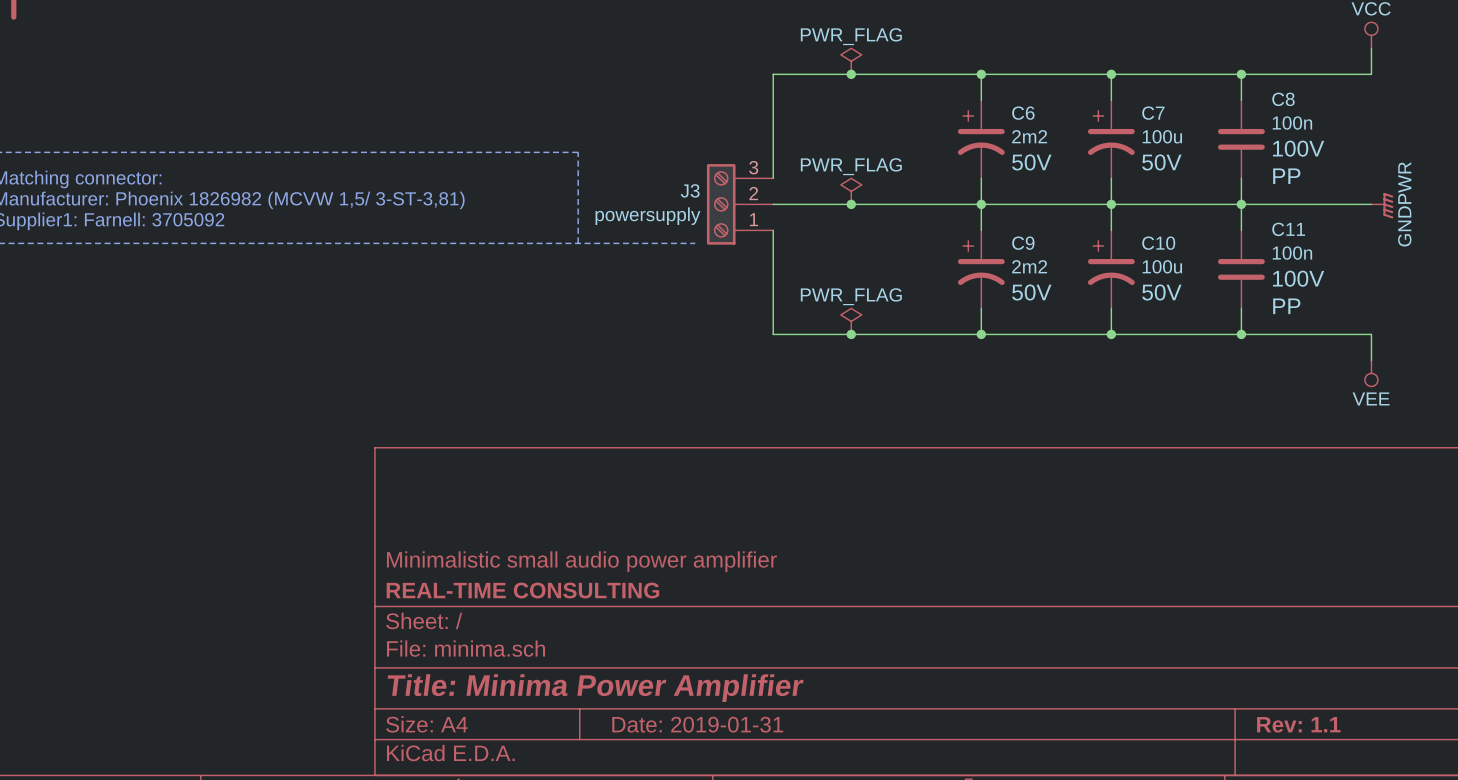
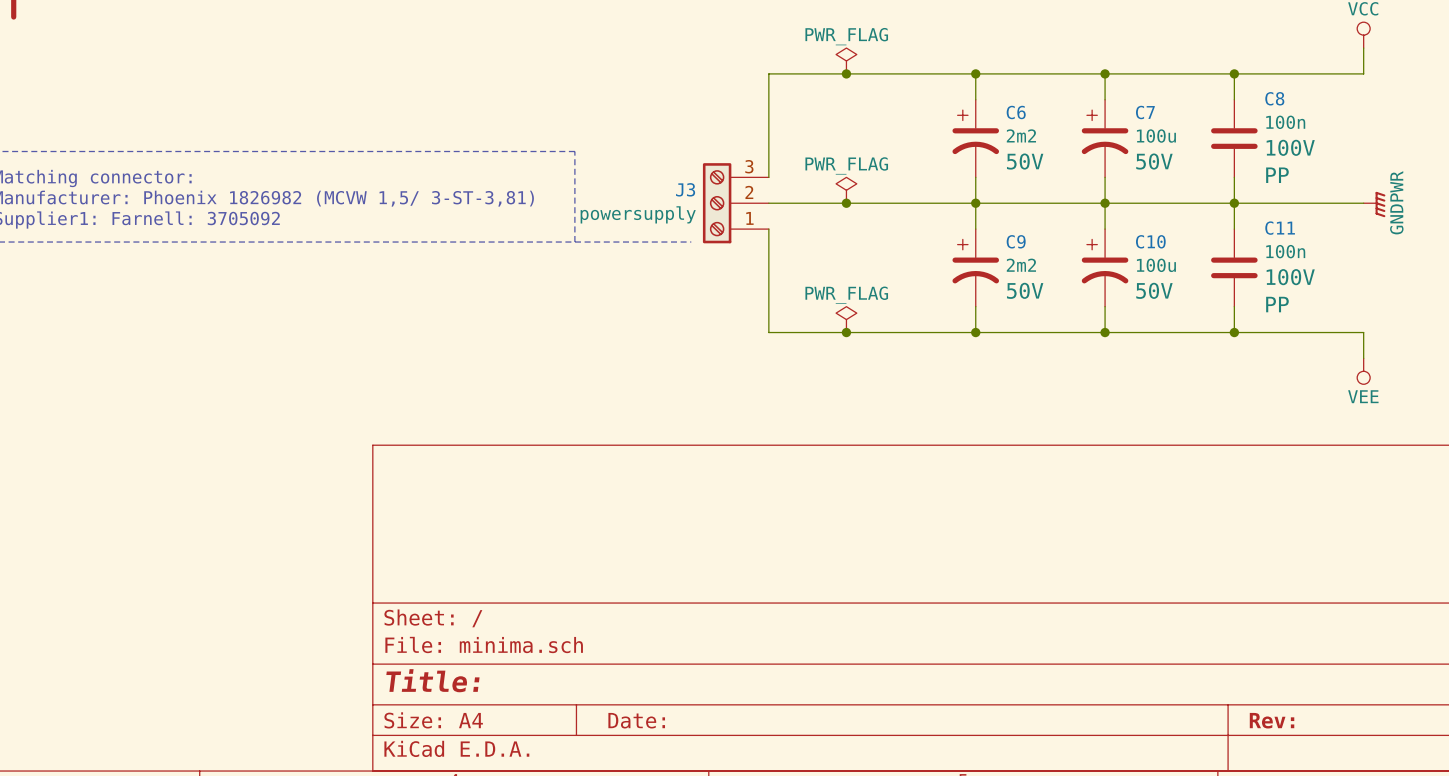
title block: Minimalistic small audio power amplifier (581, 561) -> none
title block: REAL-TIME CONSULTING (522, 590) -> none
title block: Title: Minima Power Amplifier (595, 688) -> Title: (432, 680)
title block: Date: 2019-01-31 (697, 724) -> Date: (636, 720)
title block: Rev: 1.1 (1298, 724) -> Rev: (1272, 720)

